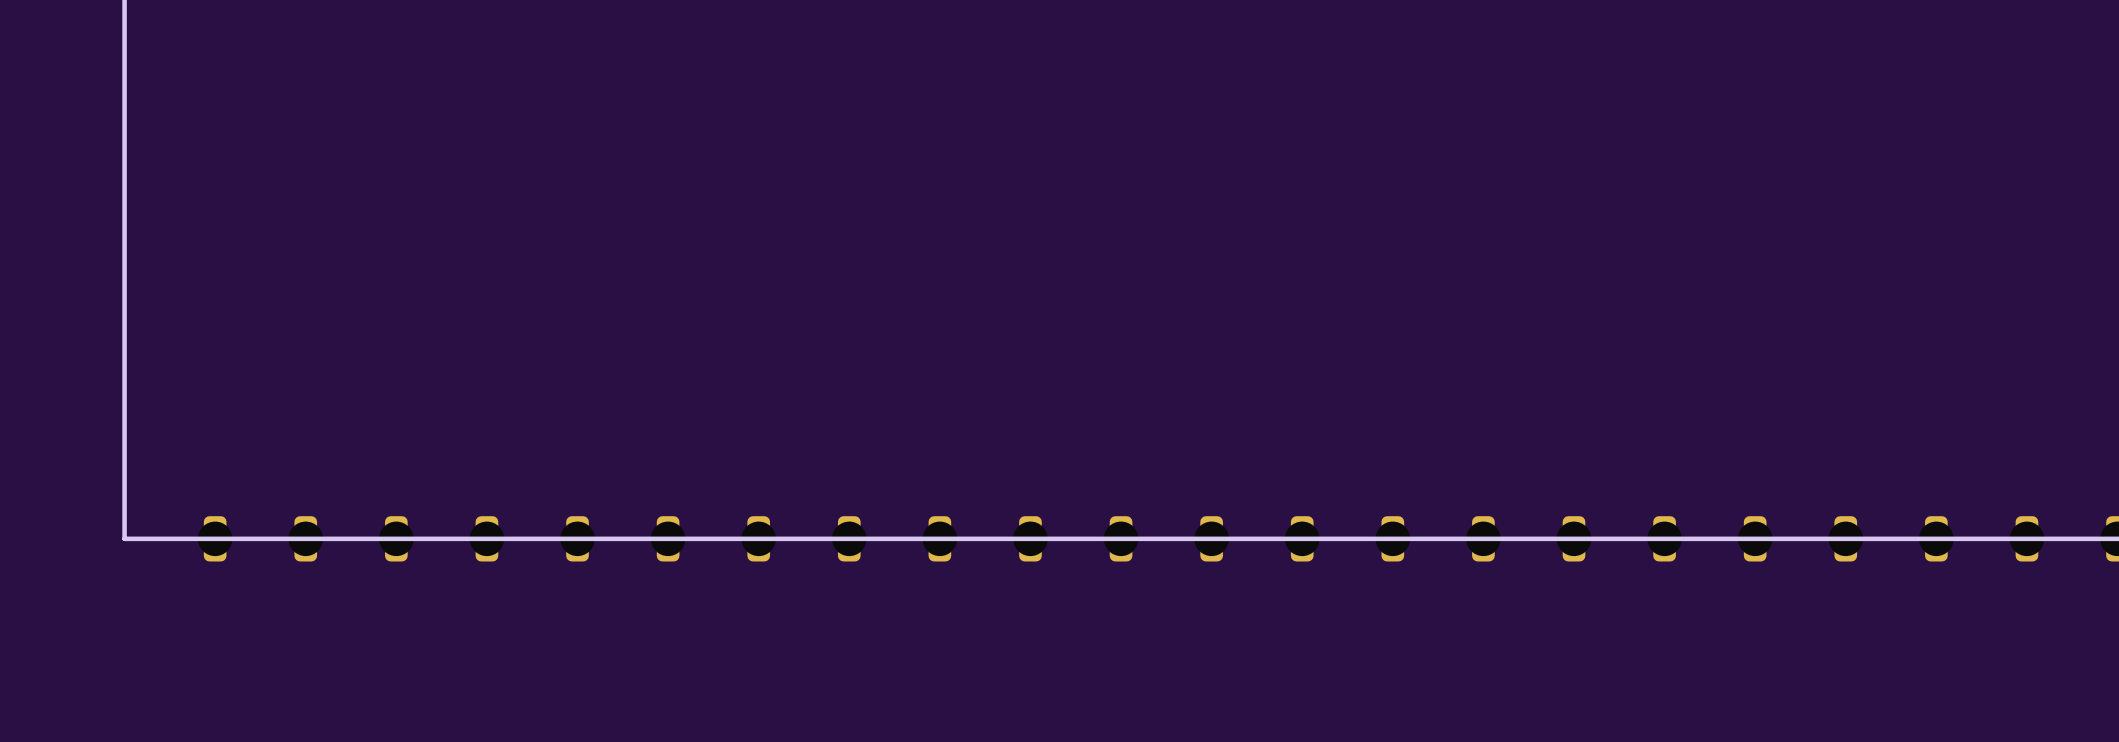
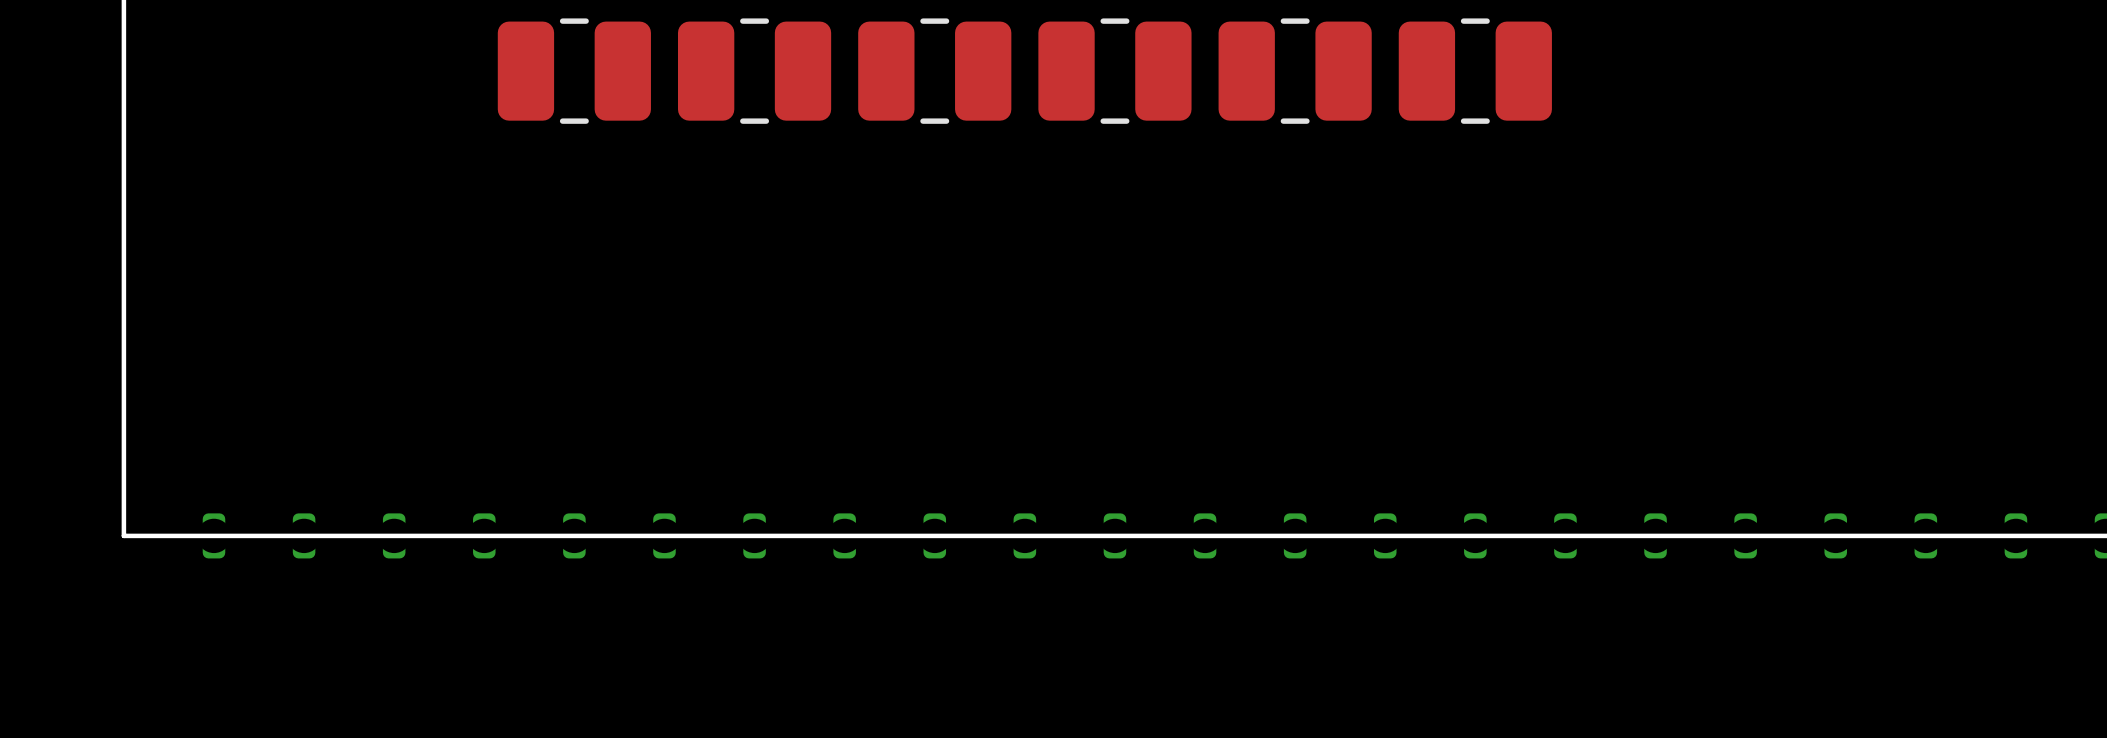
part: none -> (574, 71)
part: none -> (754, 71)
part: none -> (934, 71)
part: none -> (1114, 71)
part: none -> (1295, 71)
part: none -> (1475, 71)

